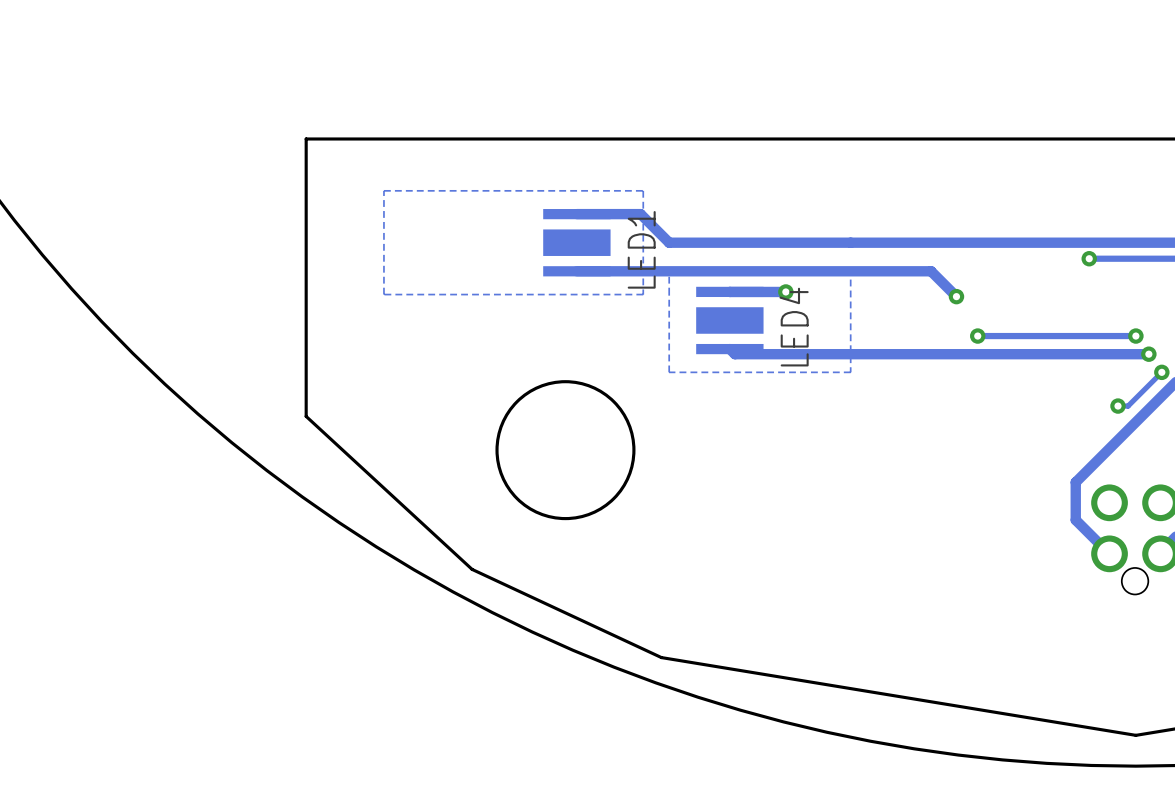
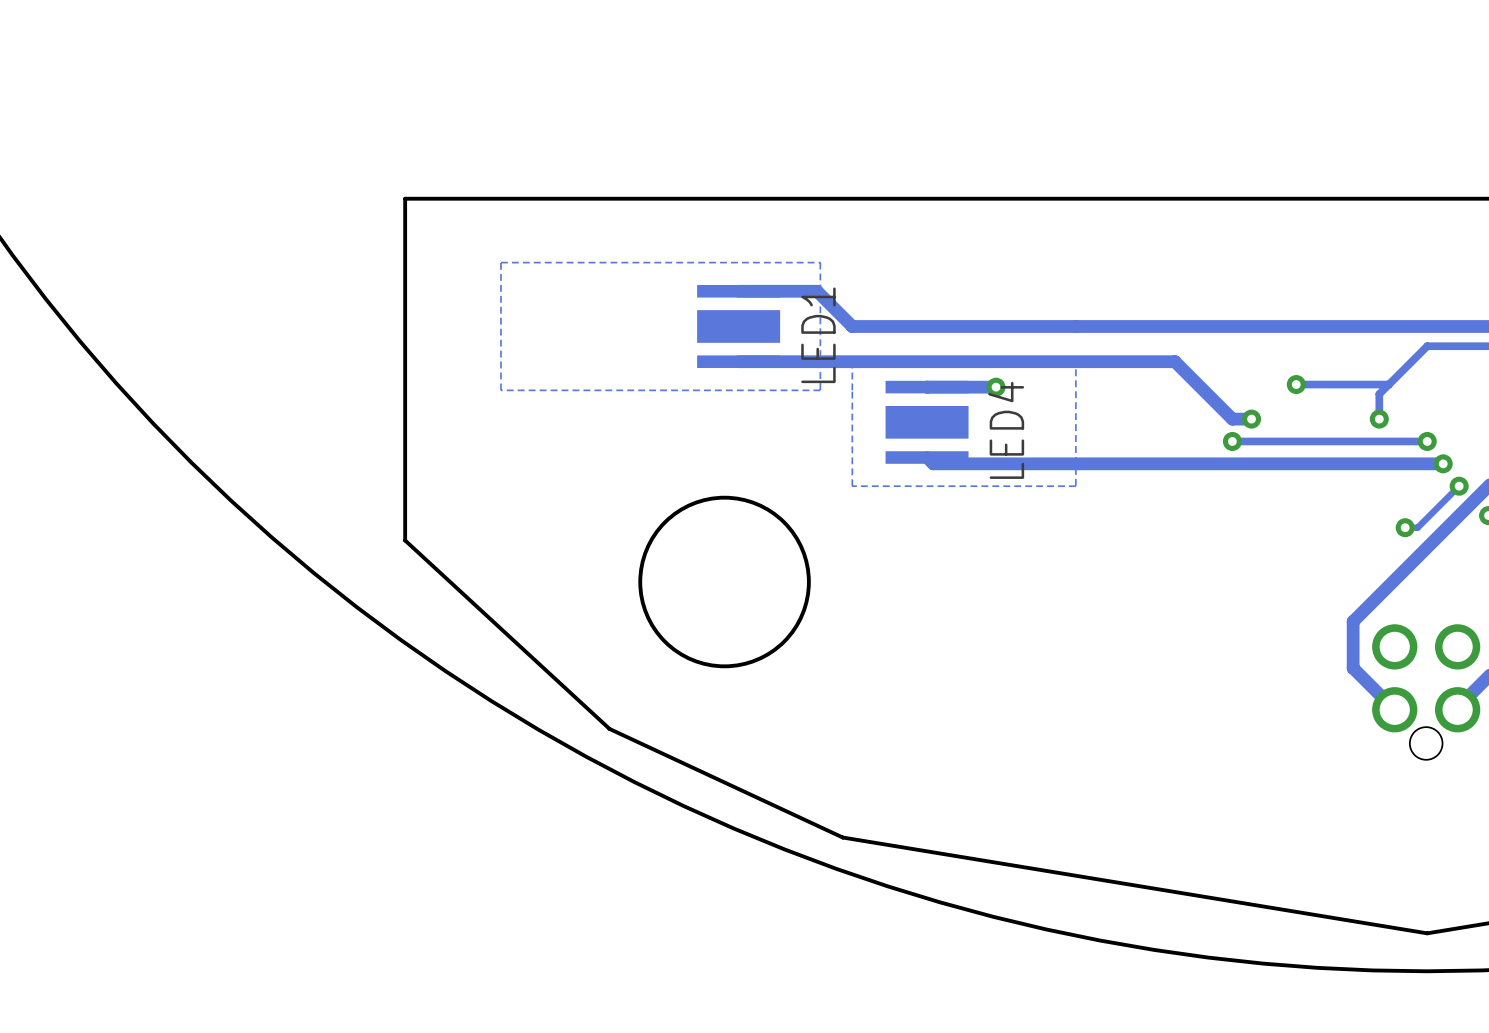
via: (1089, 258) -> none
track: (1135, 258) (1089, 258) -> (1427, 346) (1379, 394) (1379, 419)
via: none -> (1296, 384)
track: none -> (1388, 384) (1296, 384)
track: none -> (1206, 392) (1232, 419) (1251, 419)
via: (956, 296) -> none
via: none -> (1251, 419)
via: none -> (1379, 419)

